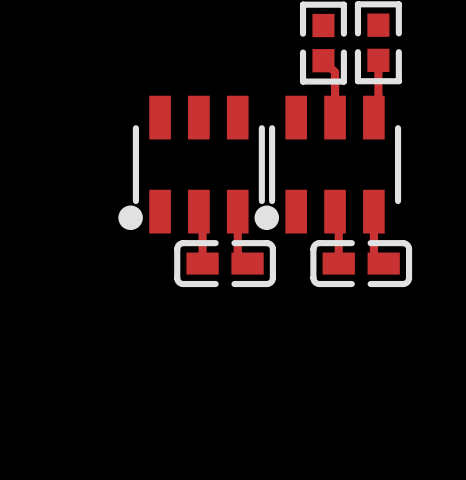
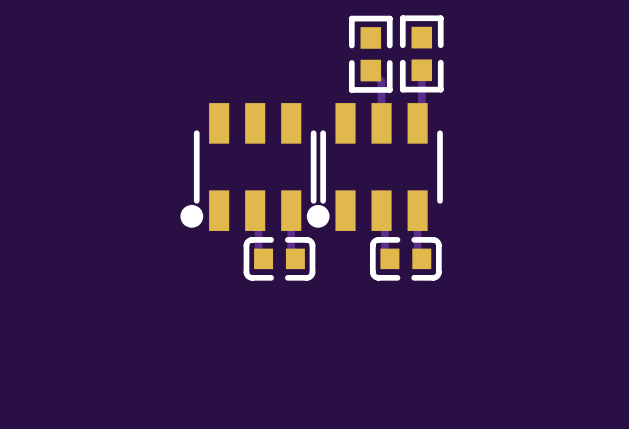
part footprint: [174, 240, 276, 288] -> [243, 237, 316, 281]
part footprint: [310, 240, 413, 288] -> [369, 237, 442, 281]

